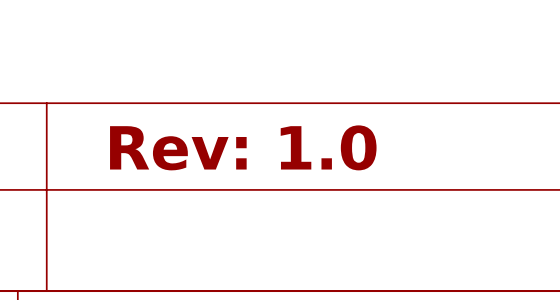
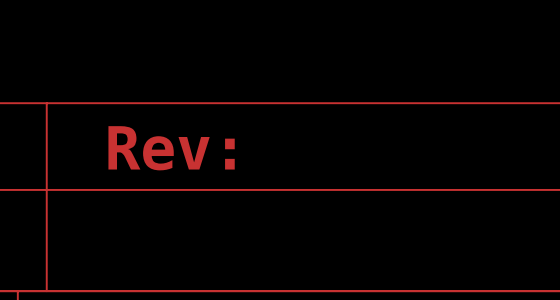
title block: Rev: 1.0 (243, 147) -> Rev: (171, 148)

